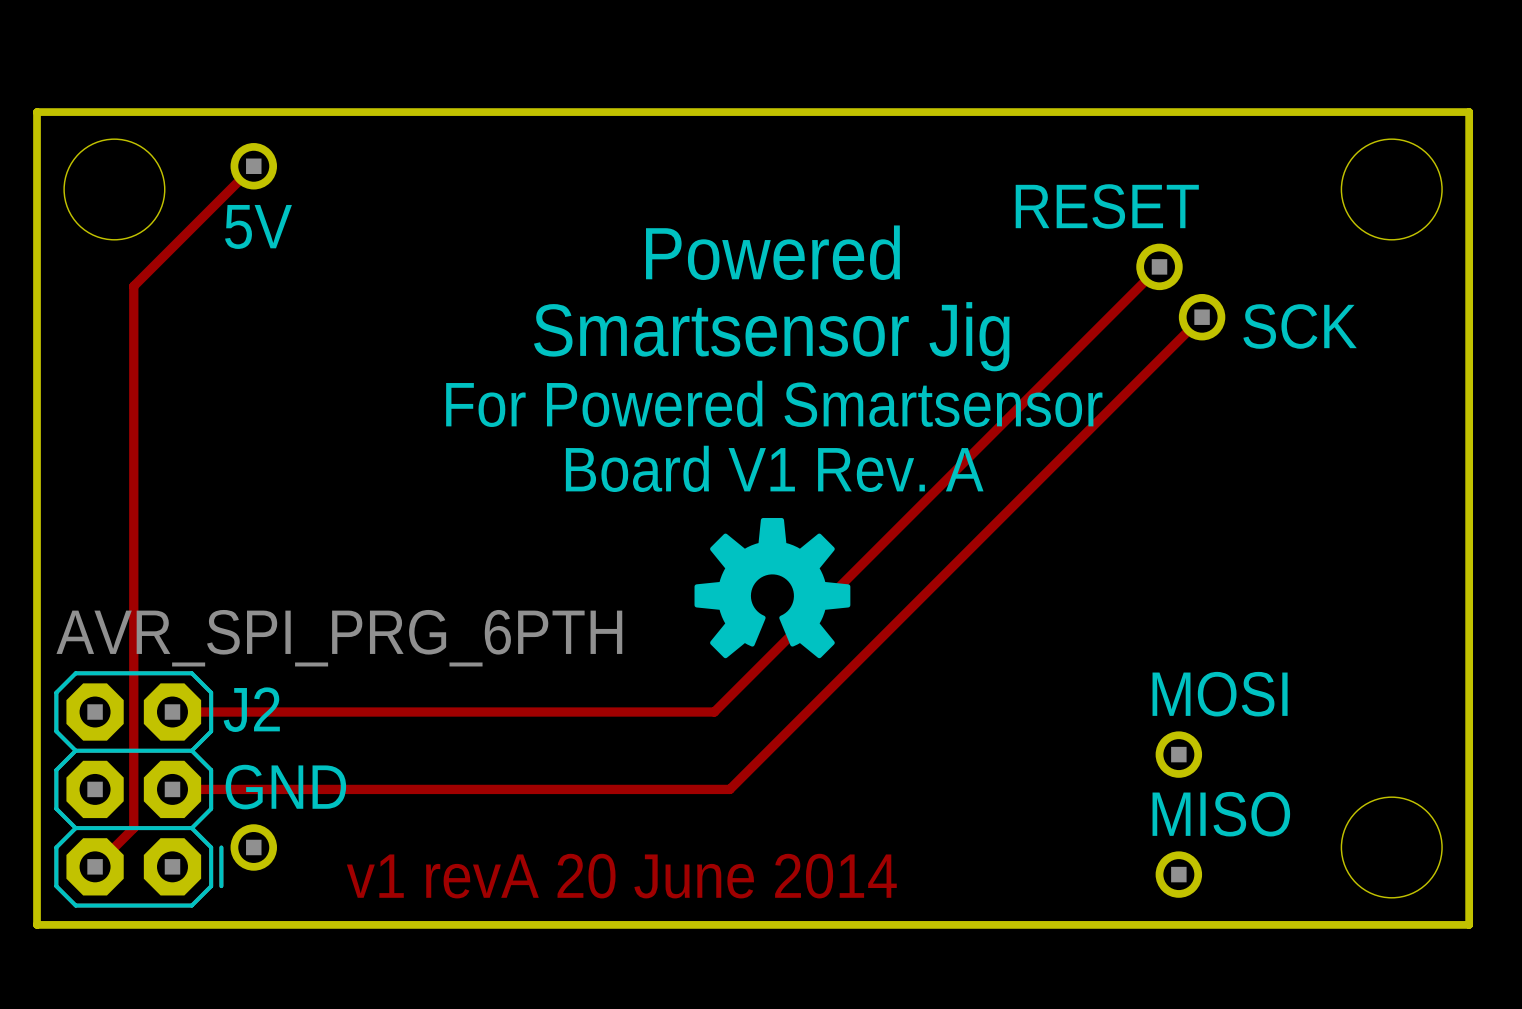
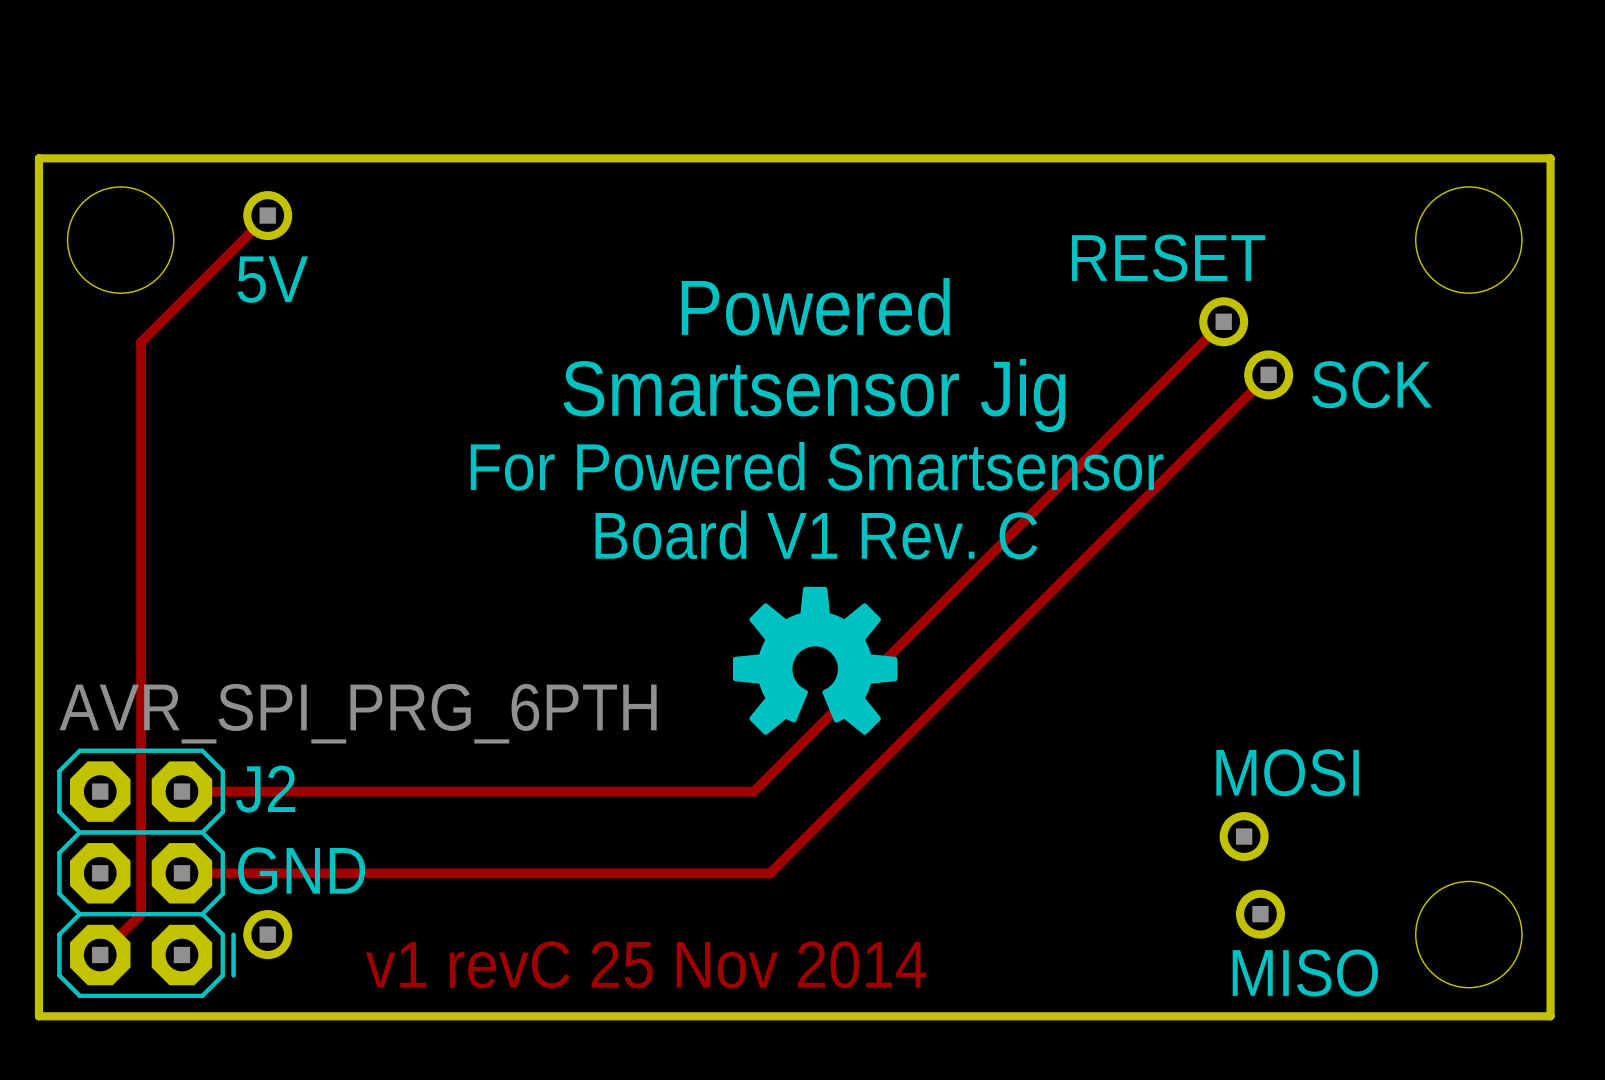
text: Board V1 Rev. A (774, 468) -> Board V1 Rev. C (816, 534)
MISO name position: MISO (1221, 814) -> MISO (1305, 972)
MISO position: (1178, 874) -> (1260, 914)
text: v1 revA 20 June 2014 (621, 876) -> v1 revC 25 Nov 2014 (646, 964)

